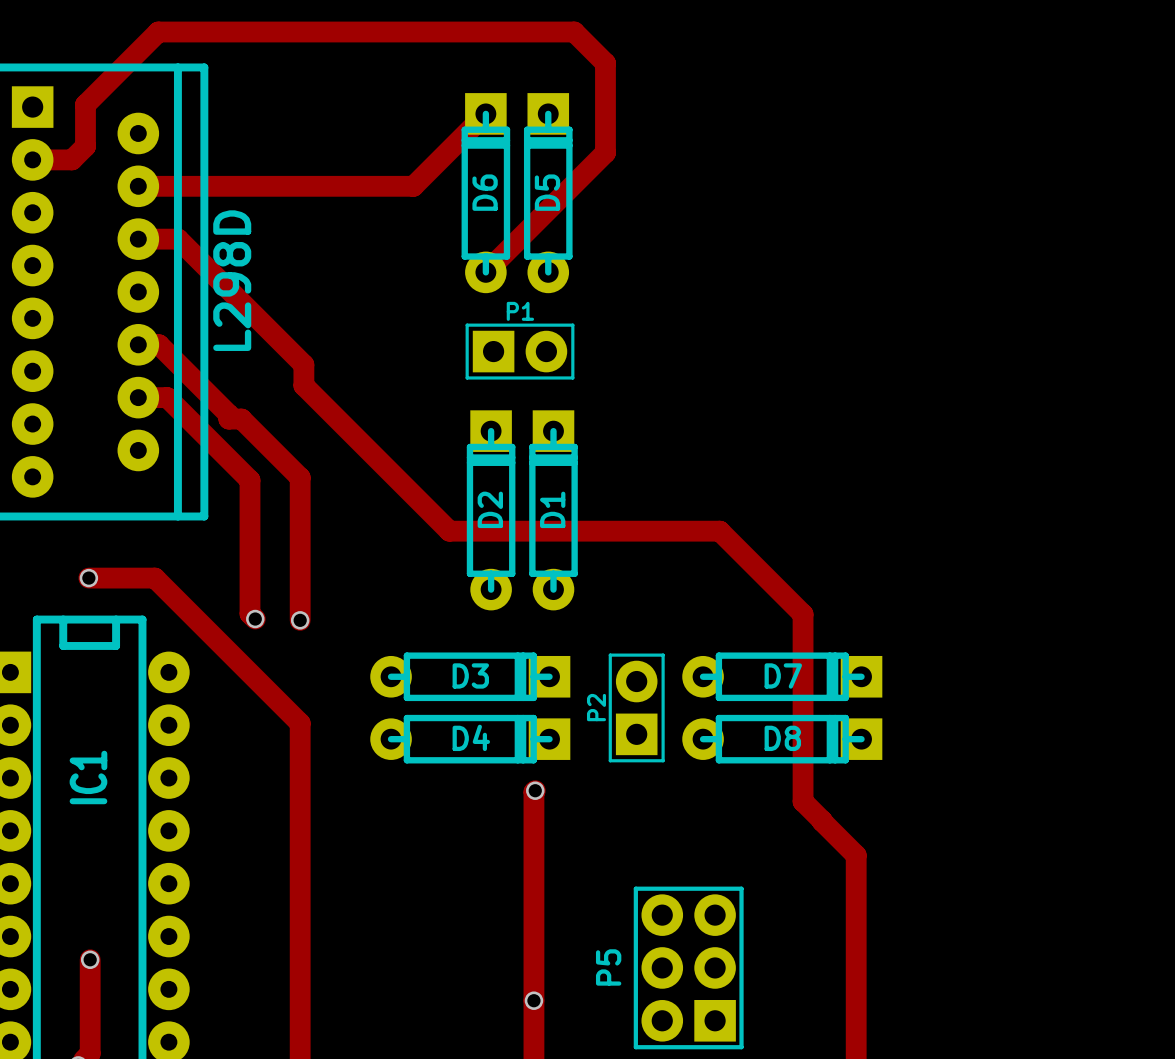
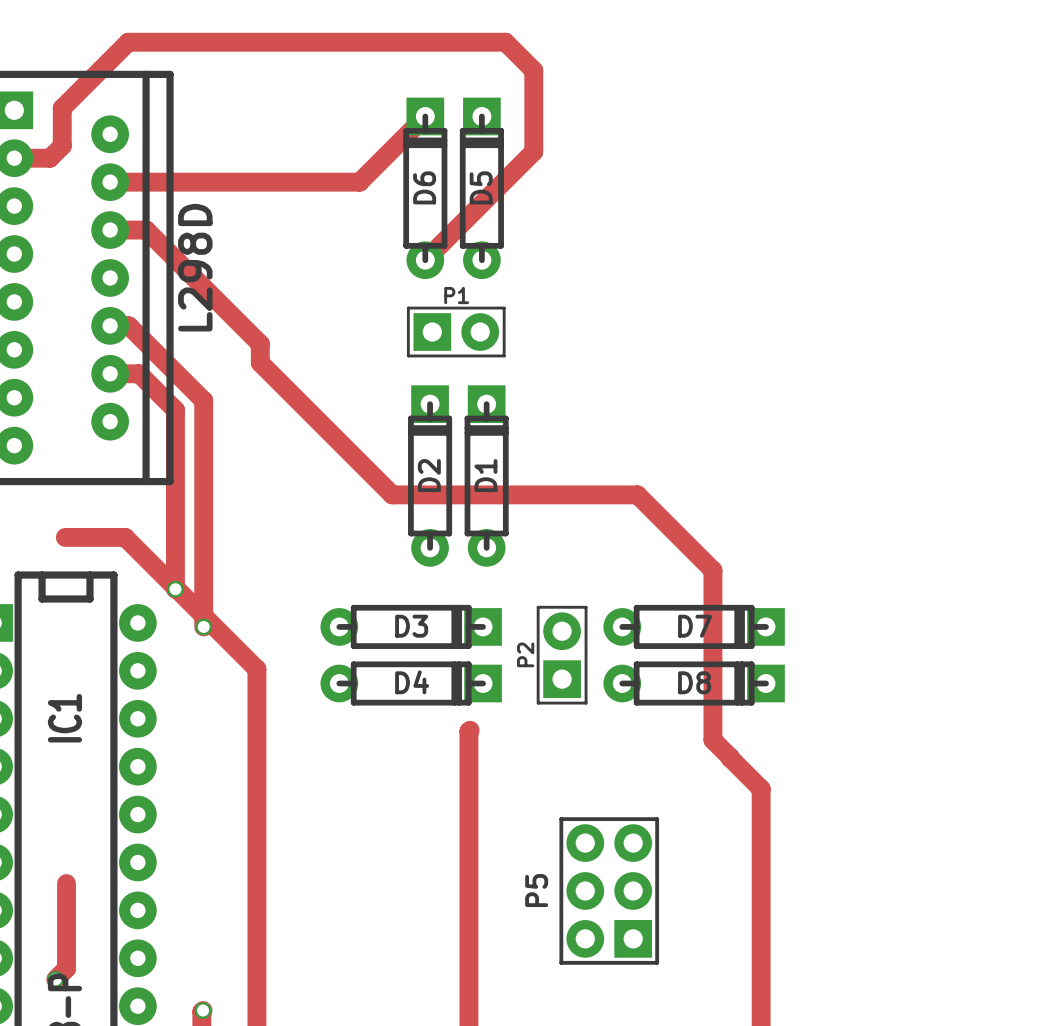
track: (167, 397) (249, 480) (249, 613) (255, 619) -> (136, 373) (139, 373) (175, 410) (175, 589)
track: (228, 414) (228, 419) (241, 419) (300, 477) (300, 620) -> (192, 389) (203, 400) (203, 626)
via: (88, 578) -> none
via: (255, 619) -> none
via: (300, 620) -> none
via: none -> (175, 589)
via: none -> (203, 626)
via: (535, 790) -> none
via: (90, 959) -> none
via: (533, 1000) -> none

